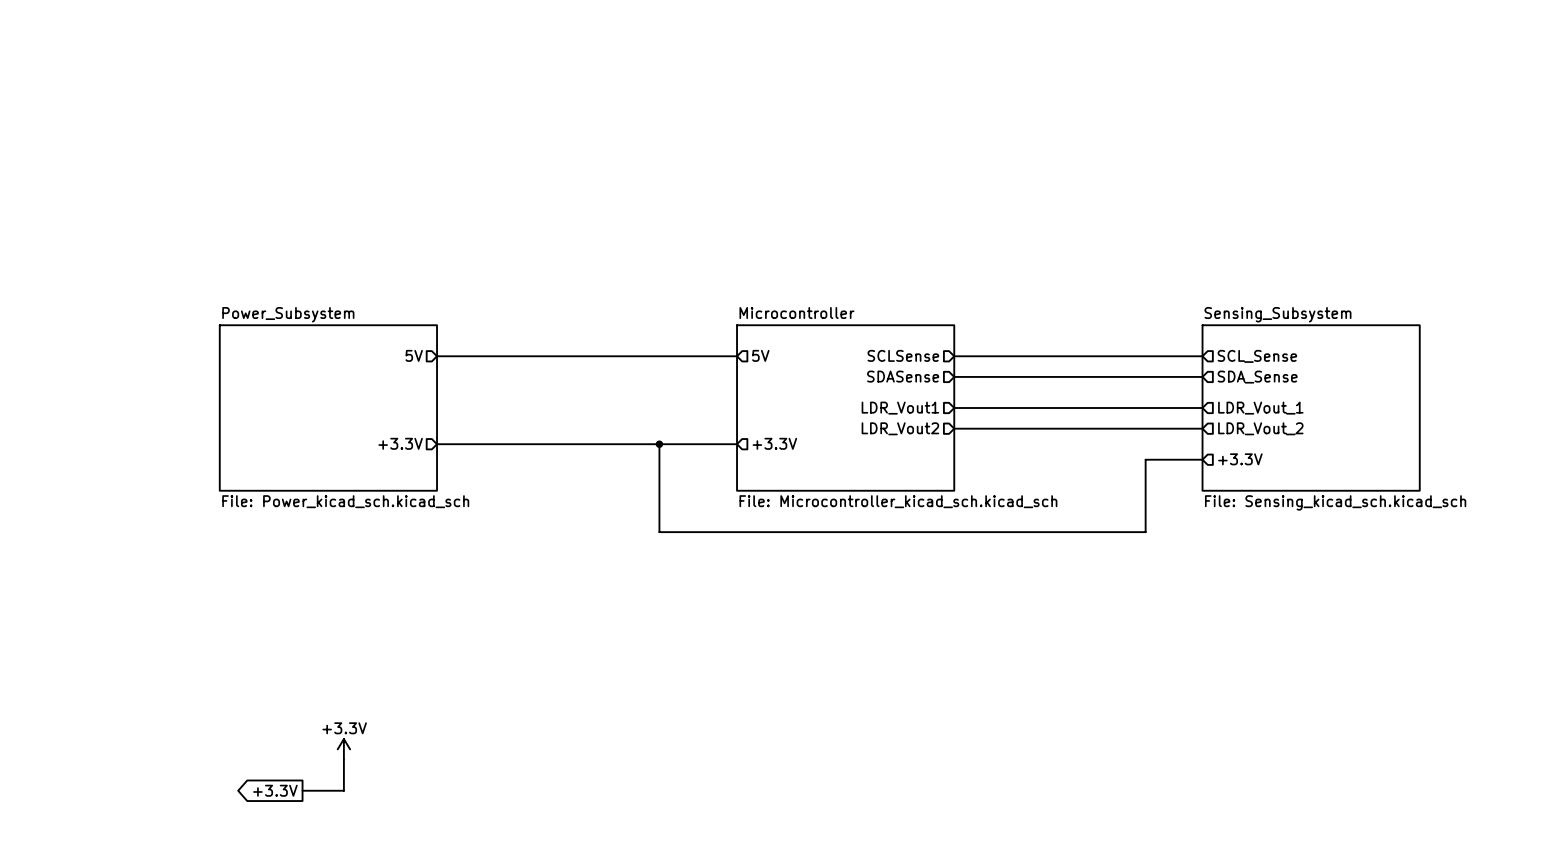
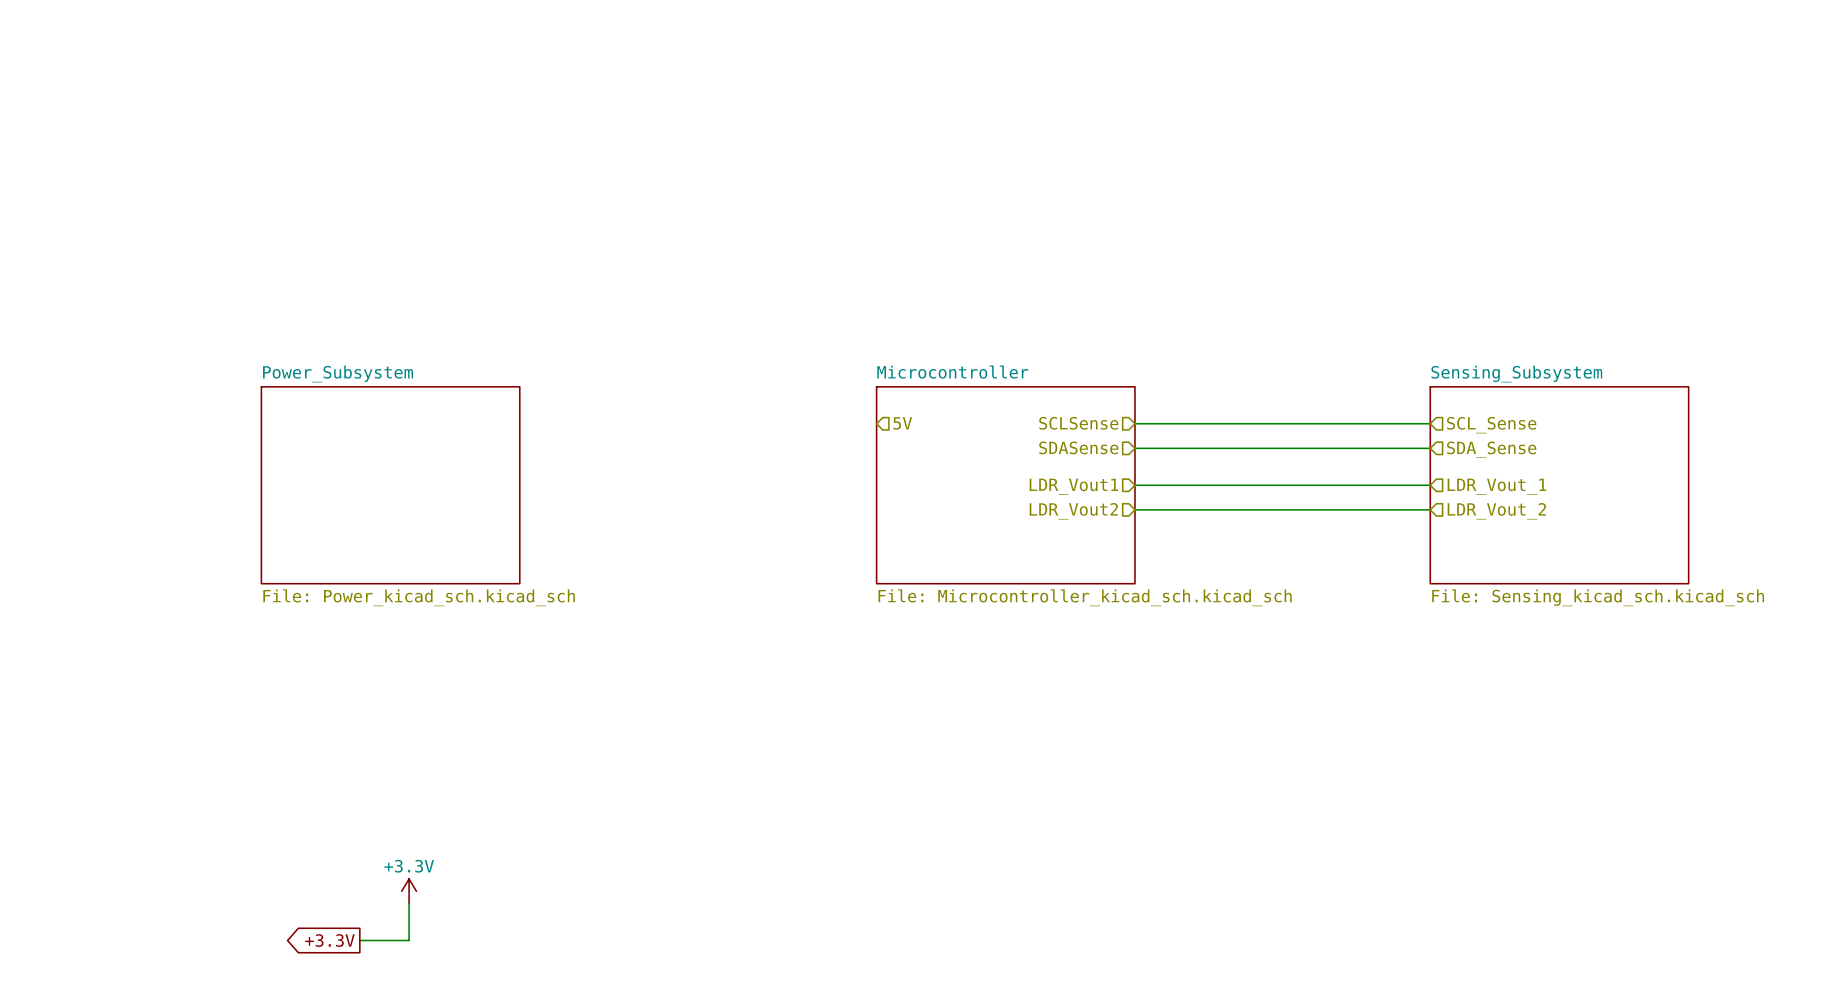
hierarchical label: 5V (414, 355) -> none
wire: (437, 356) (737, 356) -> none
hierarchical label: +3.3V (400, 443) -> none
hierarchical label: +3.3V (774, 443) -> none
wire: (437, 444) (737, 444) -> none
wire: (659, 444) (659, 532) (1145, 532) (1145, 459) (1202, 459) -> none
junction: (659, 444) -> none
hierarchical label: +3.3V (1240, 459) -> none

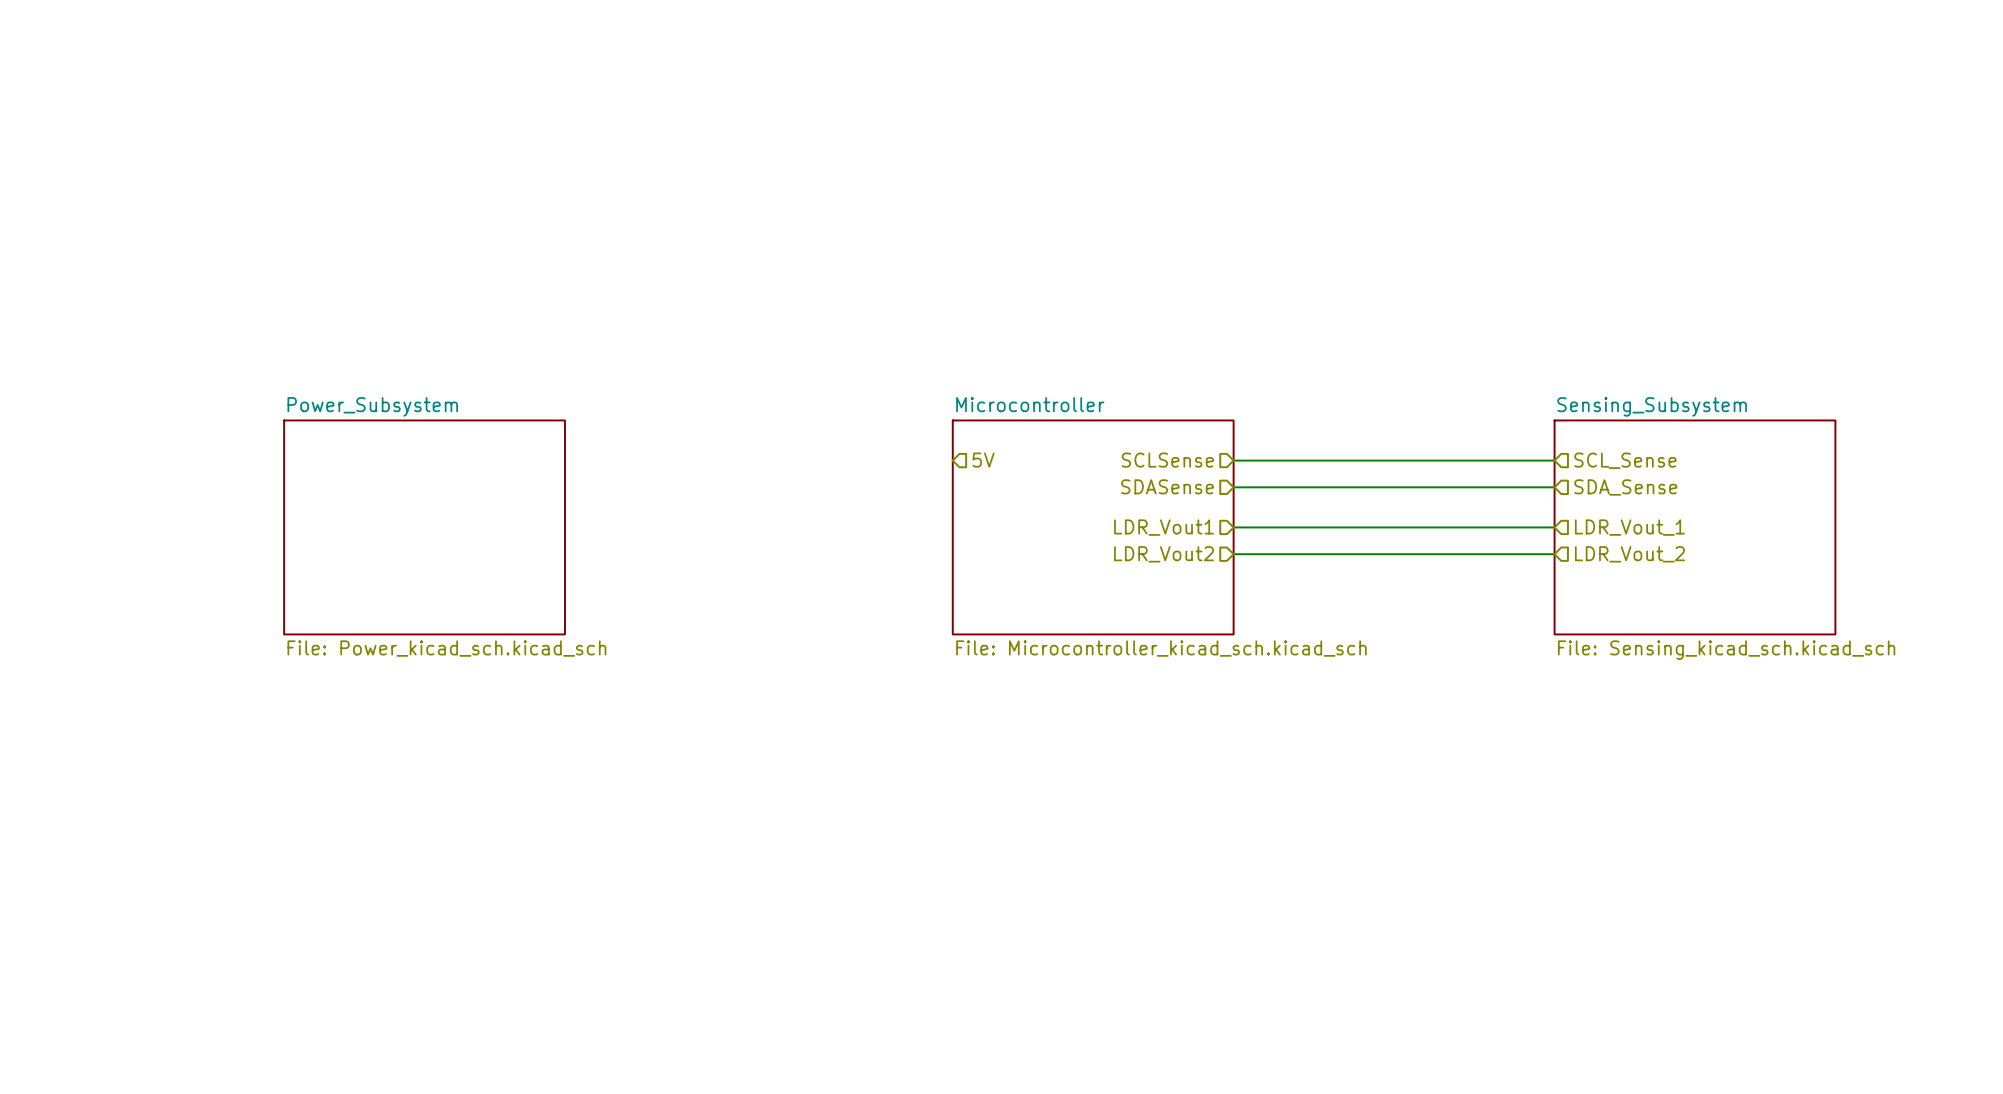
power symbol: +3.3V (409, 891) -> none
wire: (409, 903) (409, 940) (359, 940) -> none
global label: +3.3V (329, 940) -> none

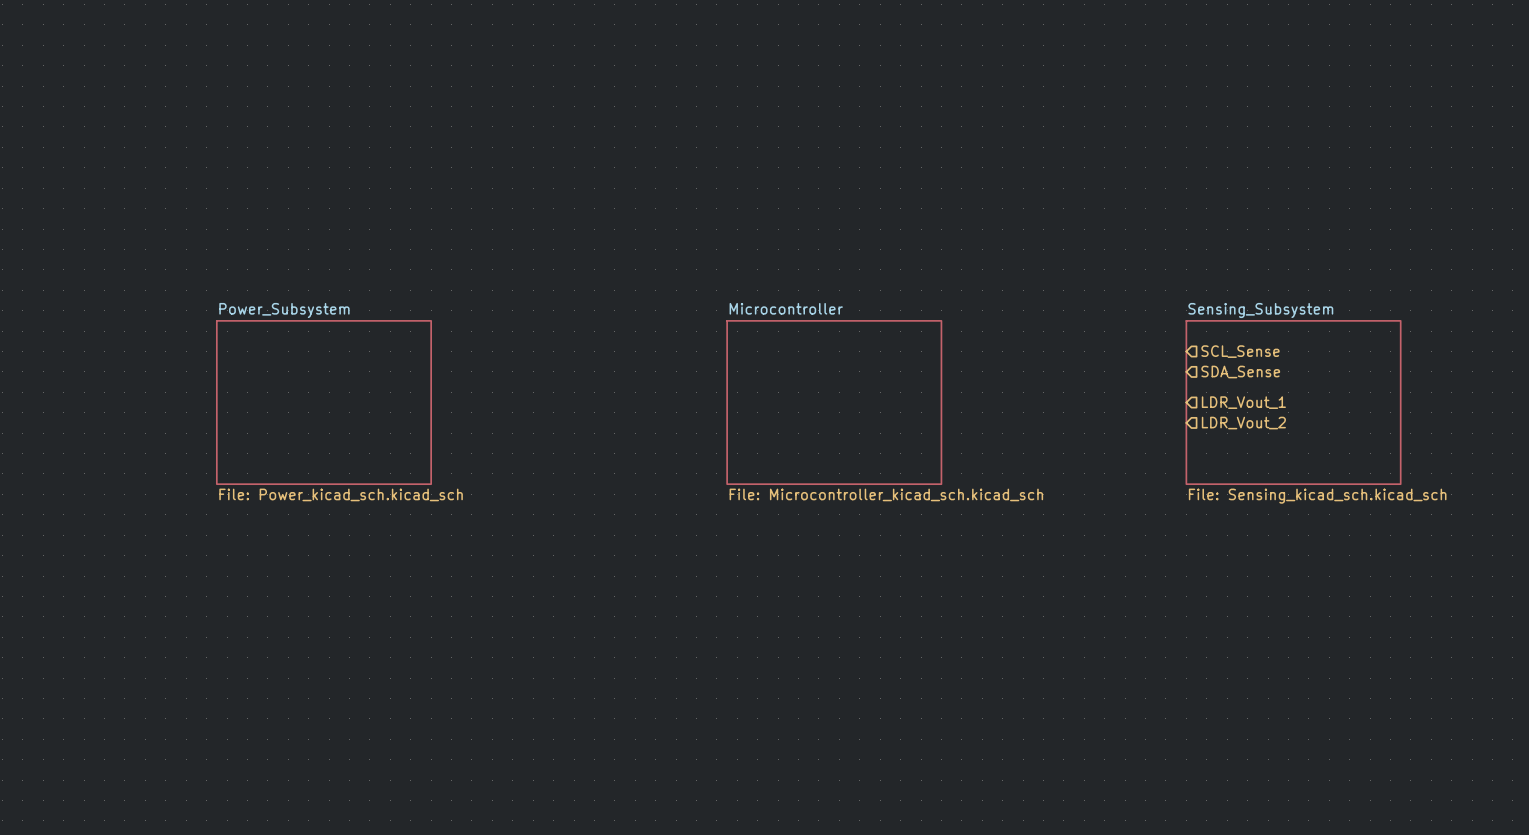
hierarchical label: 5V (983, 460) -> none
hierarchical label: SCLSense (1167, 460) -> none
wire: (1233, 460) (1554, 460) -> none
hierarchical label: SDASense (1167, 486) -> none
wire: (1233, 487) (1554, 487) -> none
hierarchical label: LDR_Vout1 (1163, 527) -> none
wire: (1233, 527) (1554, 527) -> none
hierarchical label: LDR_Vout2 (1163, 554) -> none
wire: (1233, 554) (1554, 554) -> none

